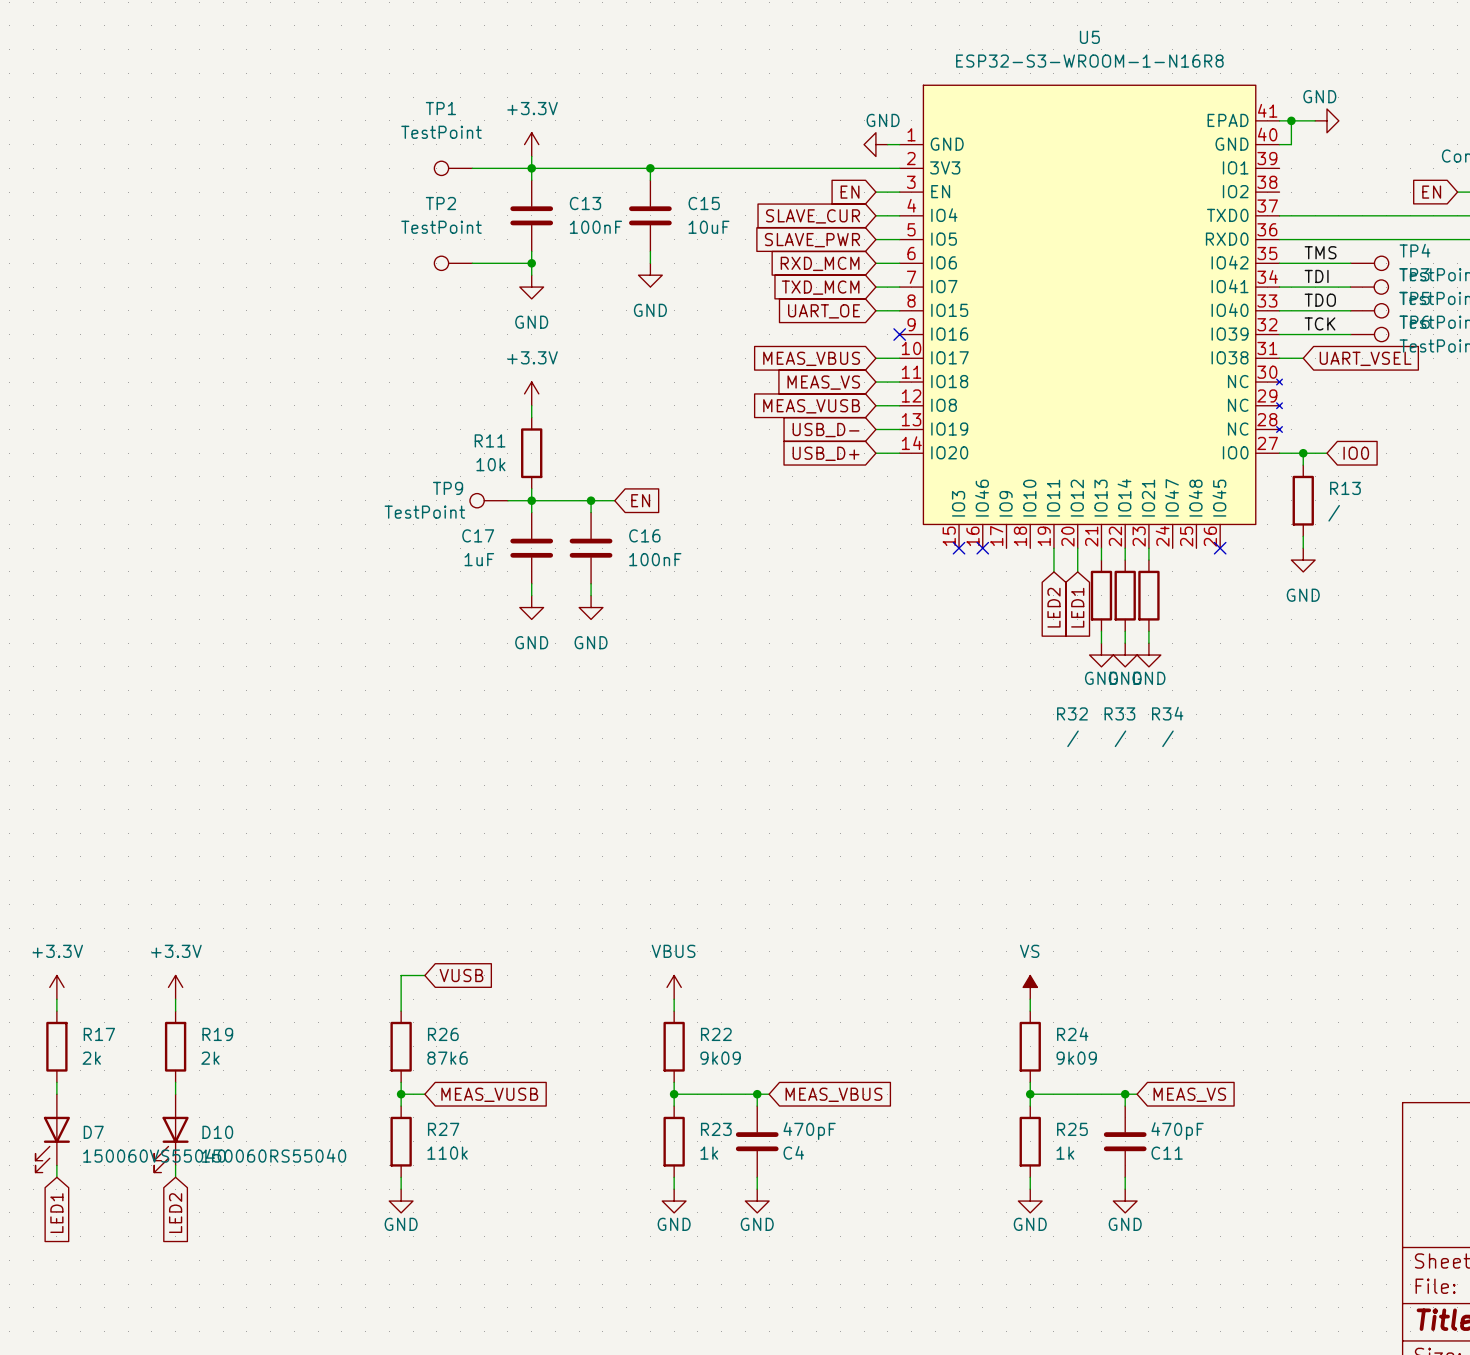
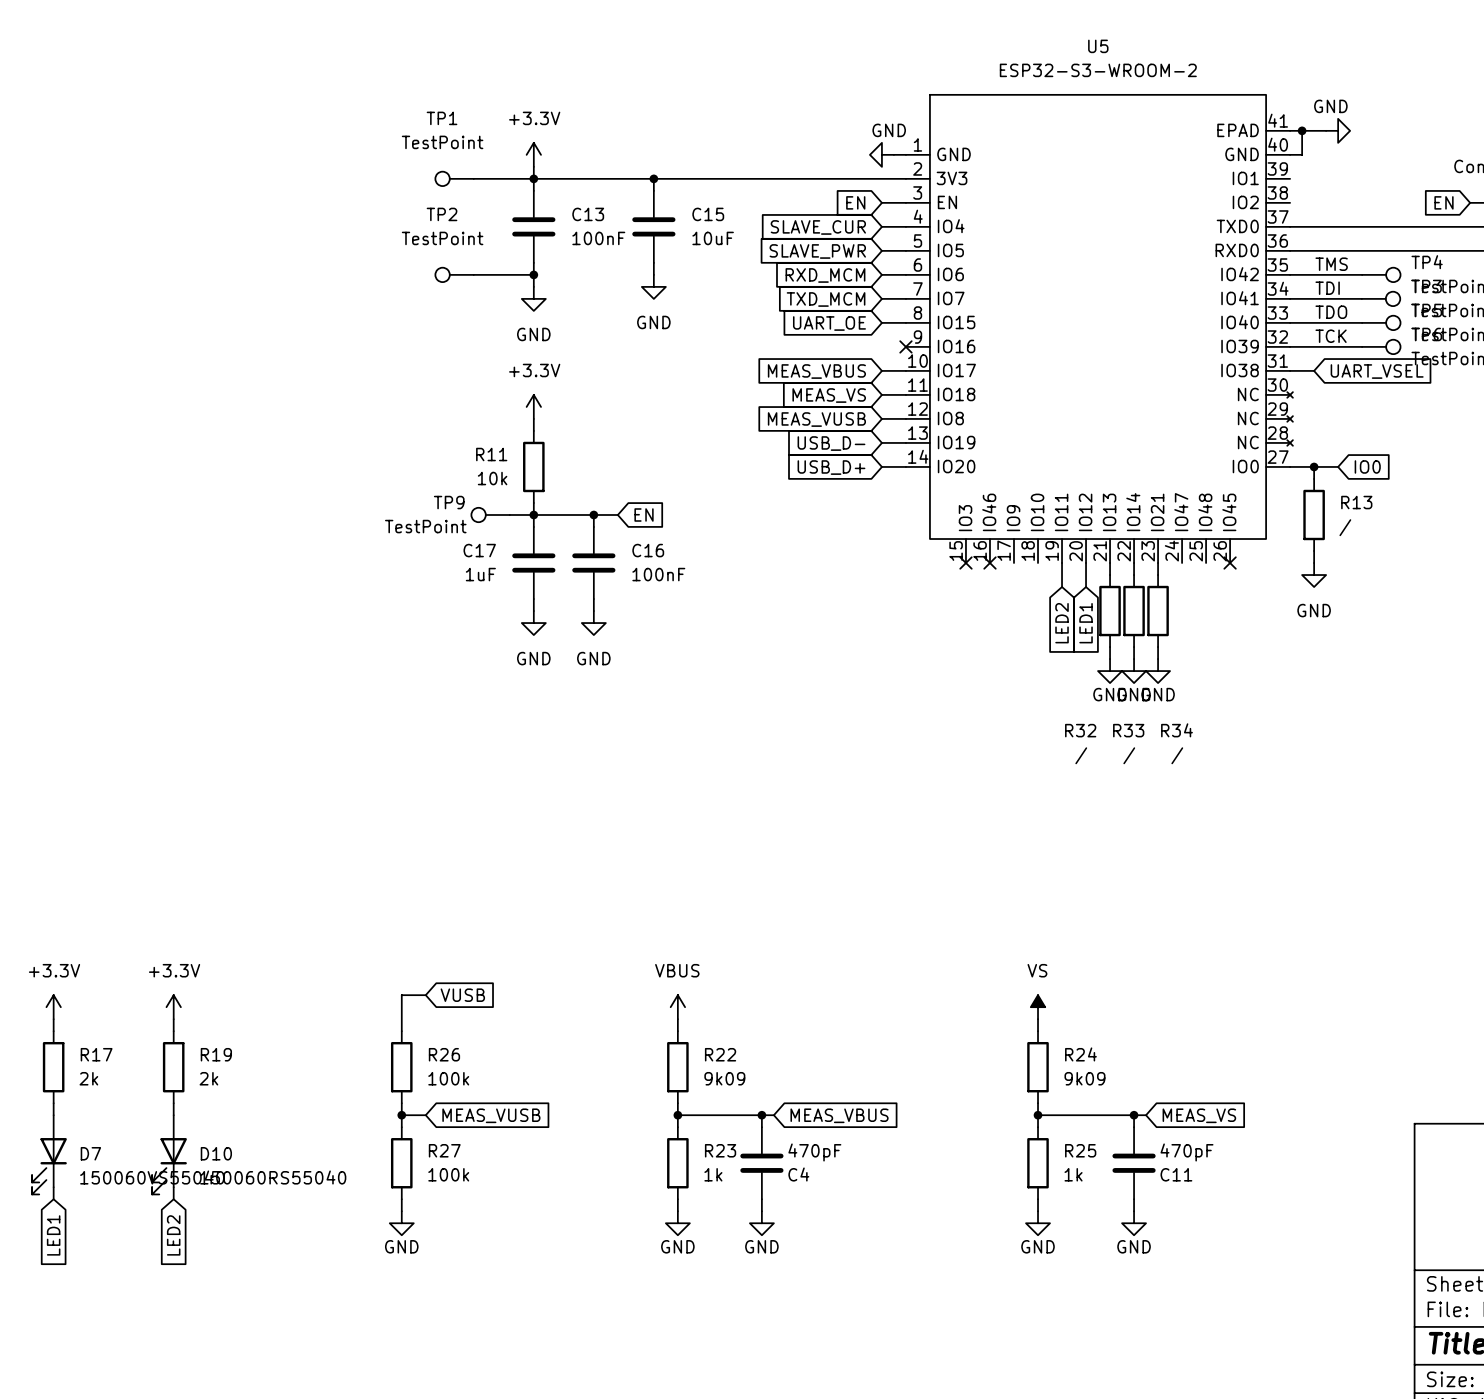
U5 value: ESP32-S3-WROOM-1-N16R8 (1089, 61) -> ESP32-S3-WROOM-2 (1098, 70)
R26 value: 87k6 (447, 1058) -> 100k (448, 1078)
R27 value: 110k (447, 1153) -> 100k (448, 1174)

